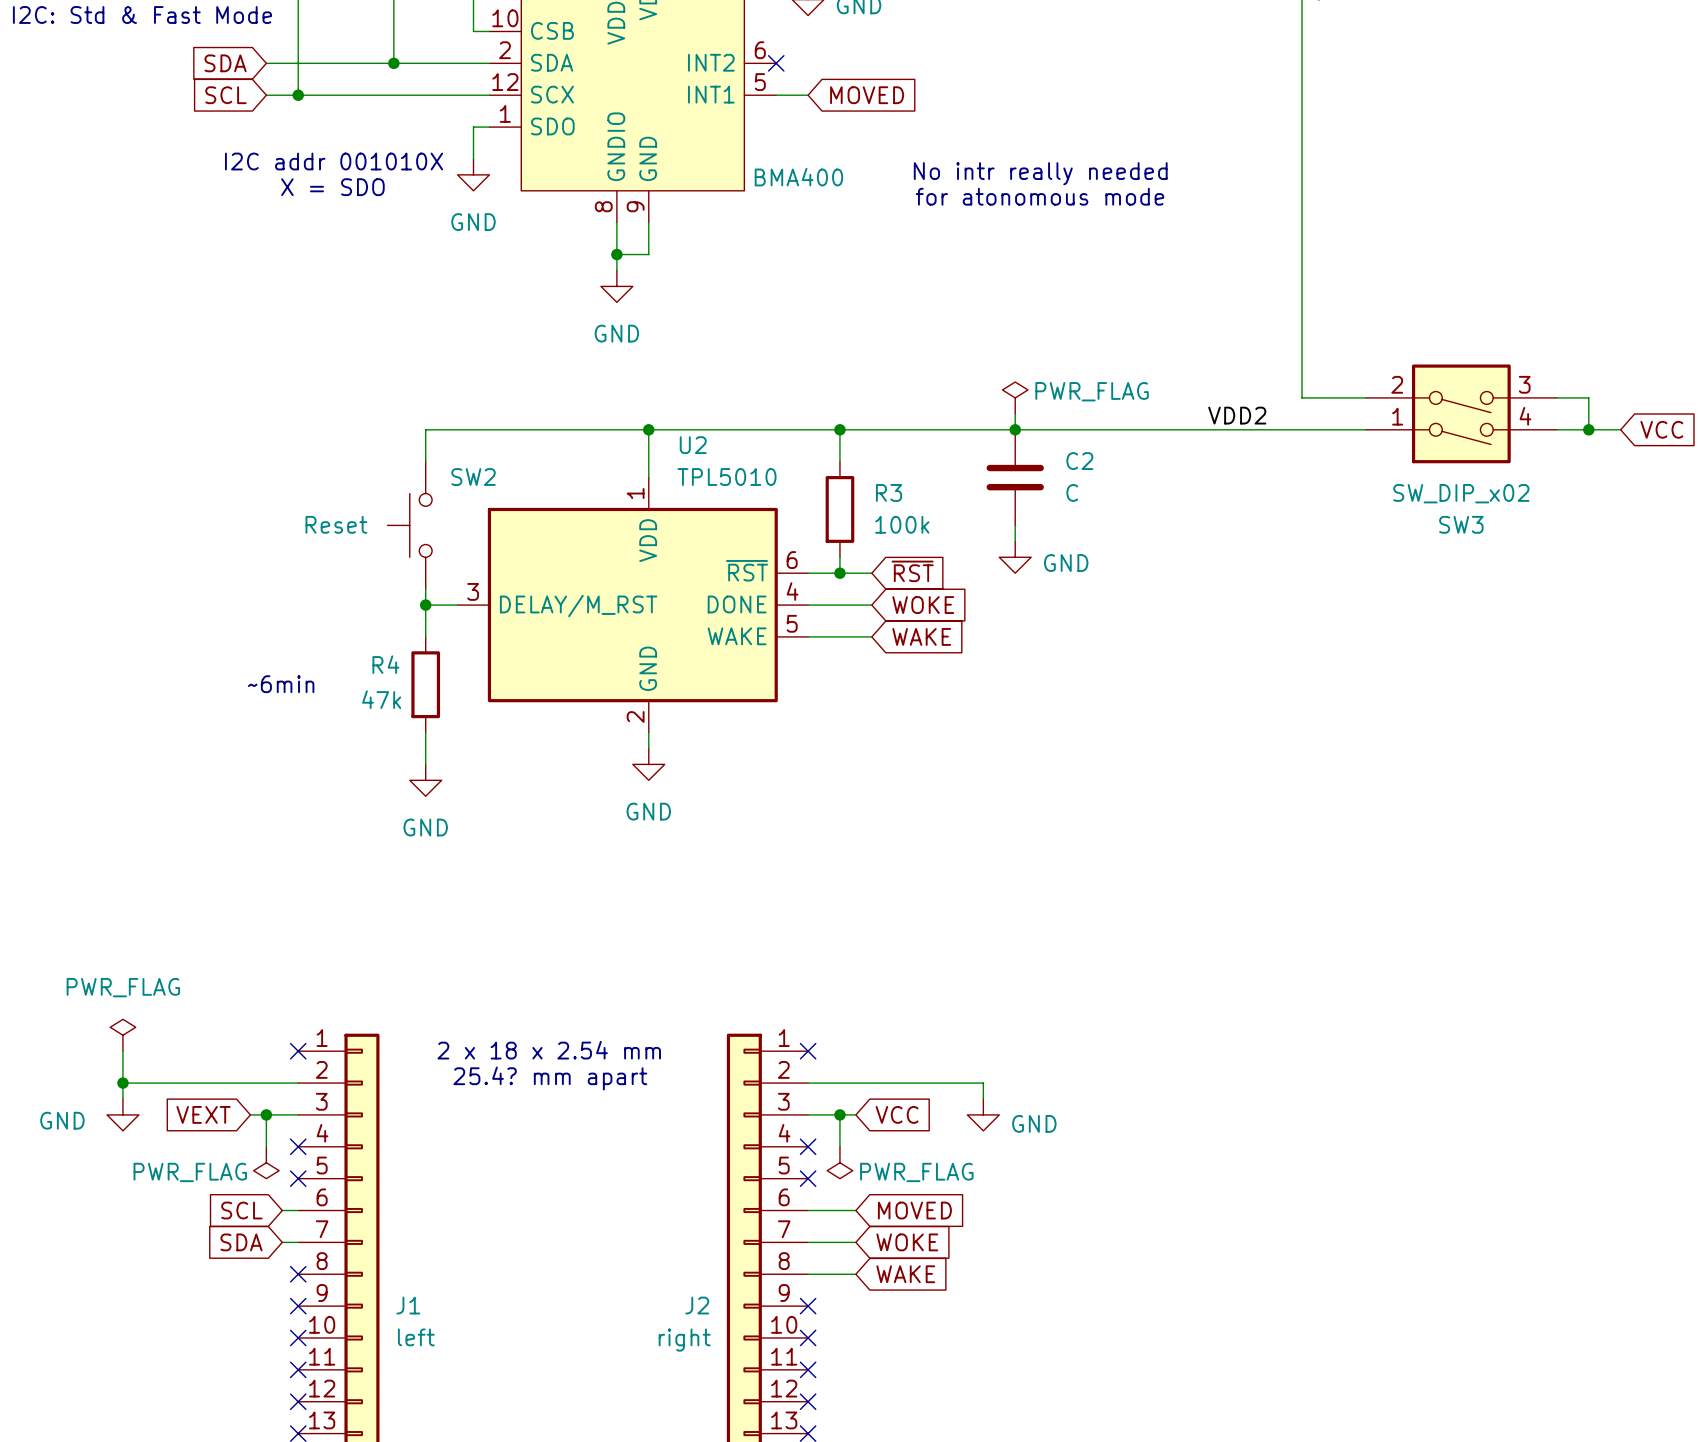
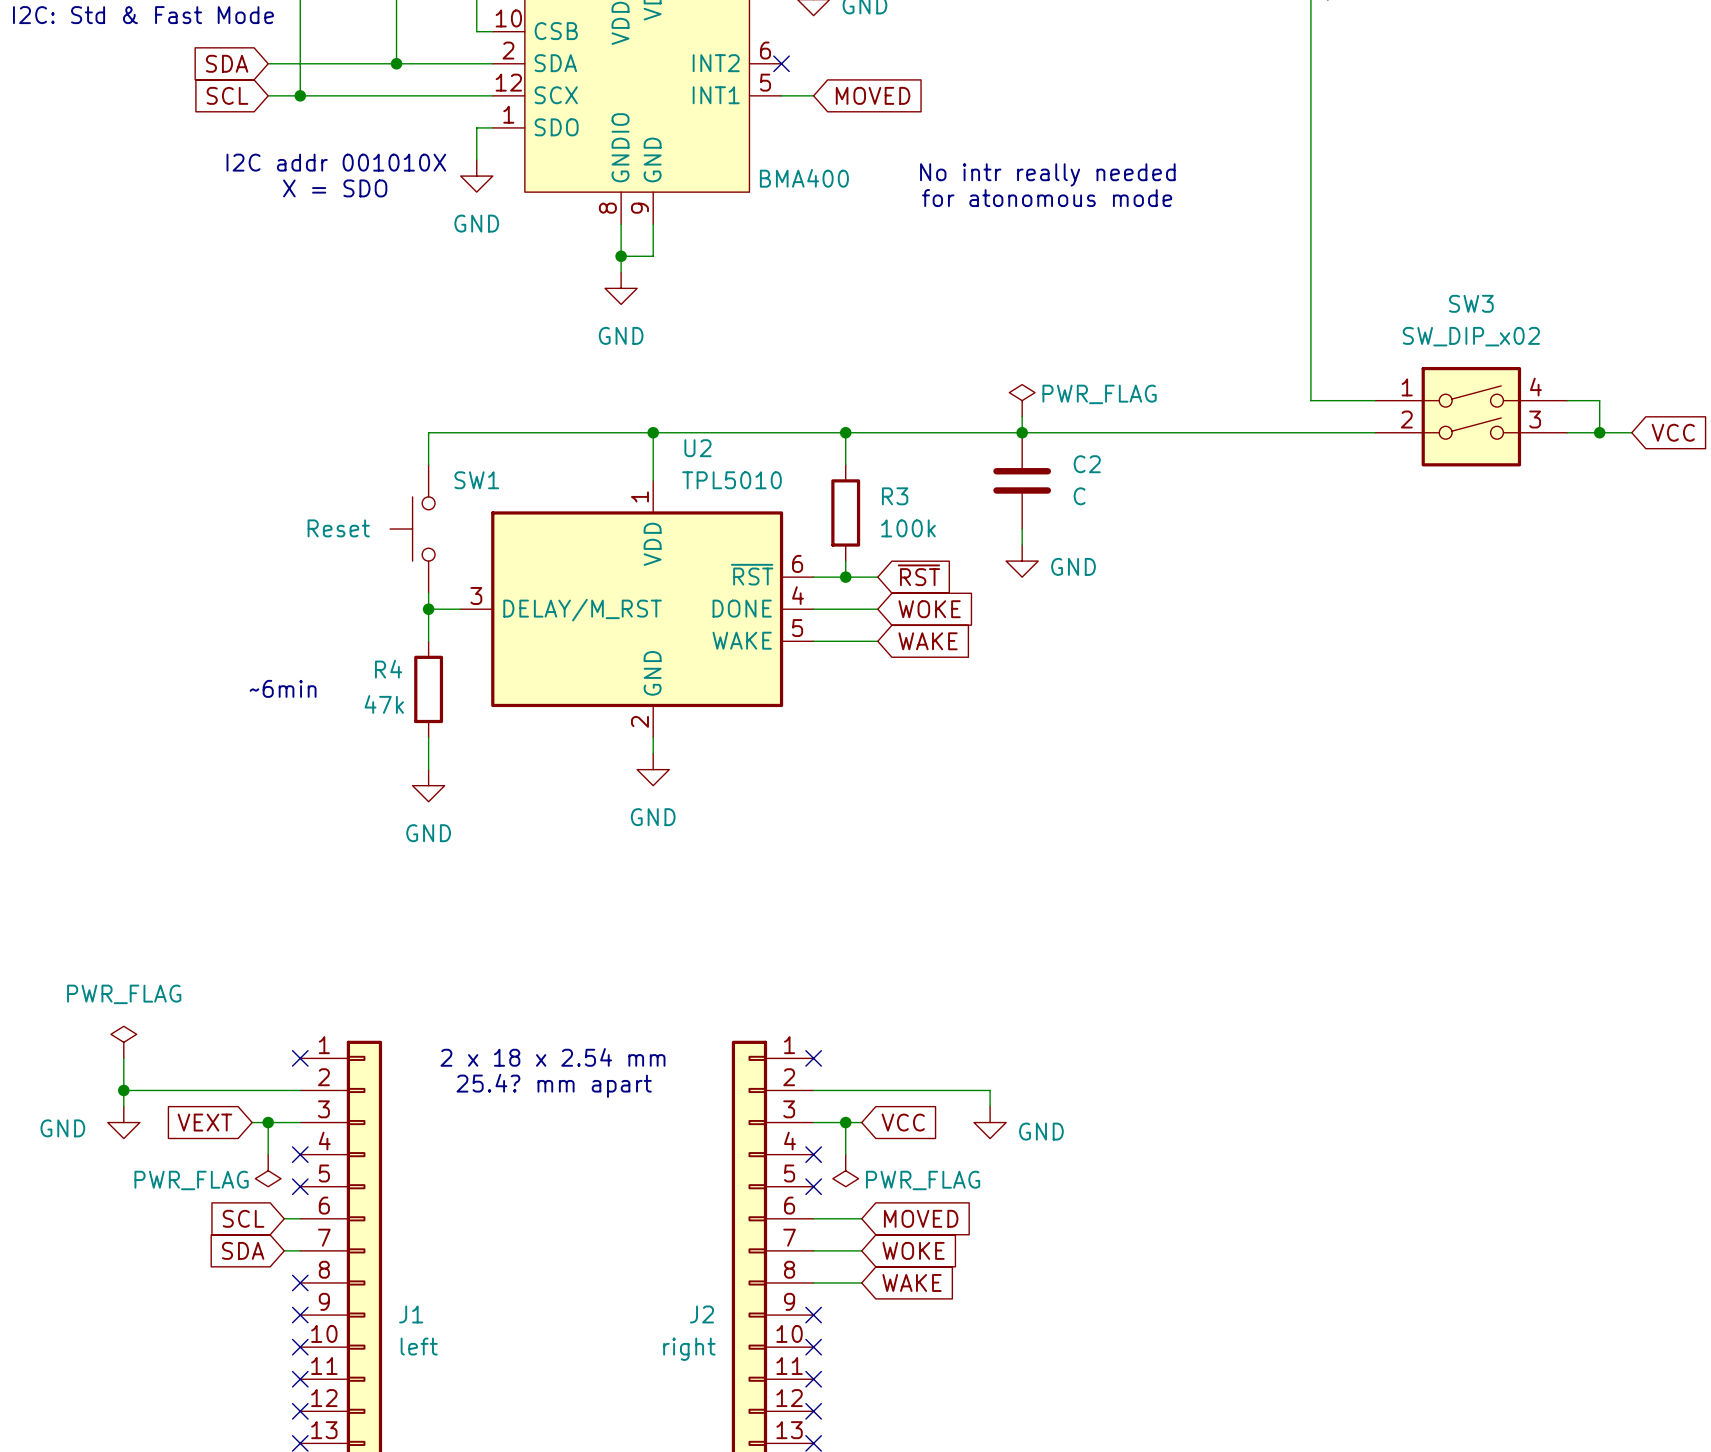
SW3 flip: as is (1461, 413) -> up-down (1471, 416)
label: VDD2 (1237, 415) -> none
SW2 name: SW2 (473, 477) -> SW1 (476, 480)

